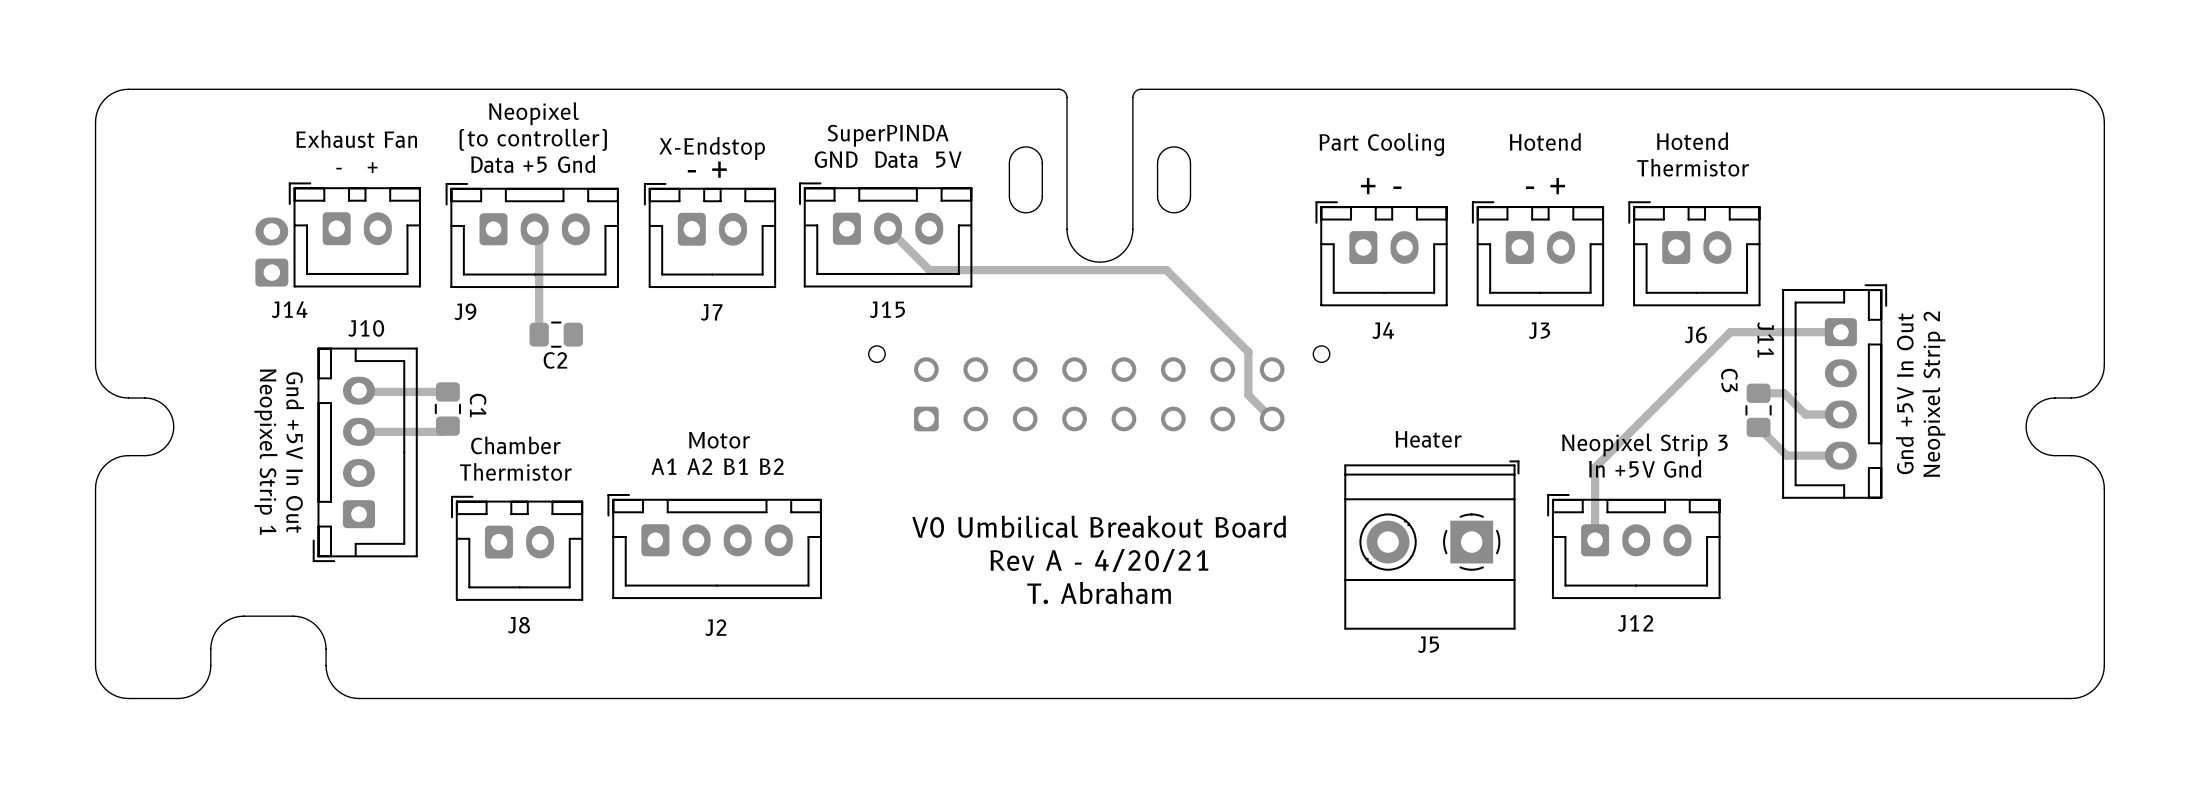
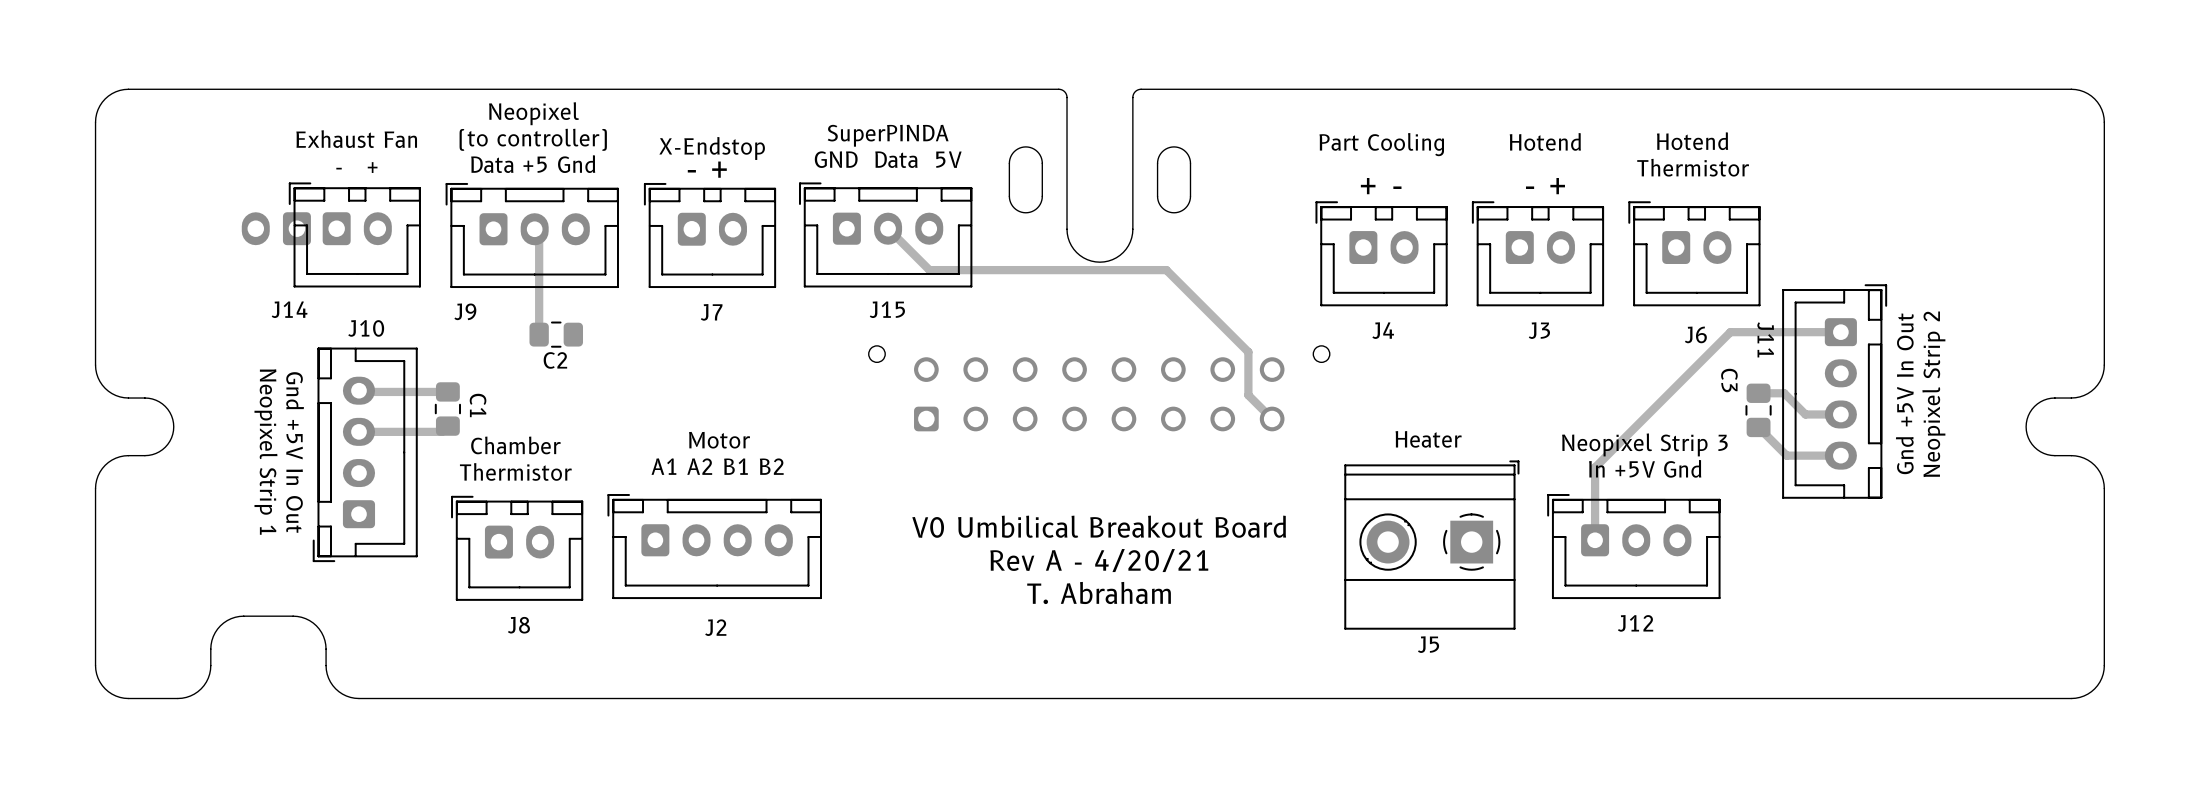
part rotation: 0° (271, 252) -> 90° counterclockwise (276, 228)

